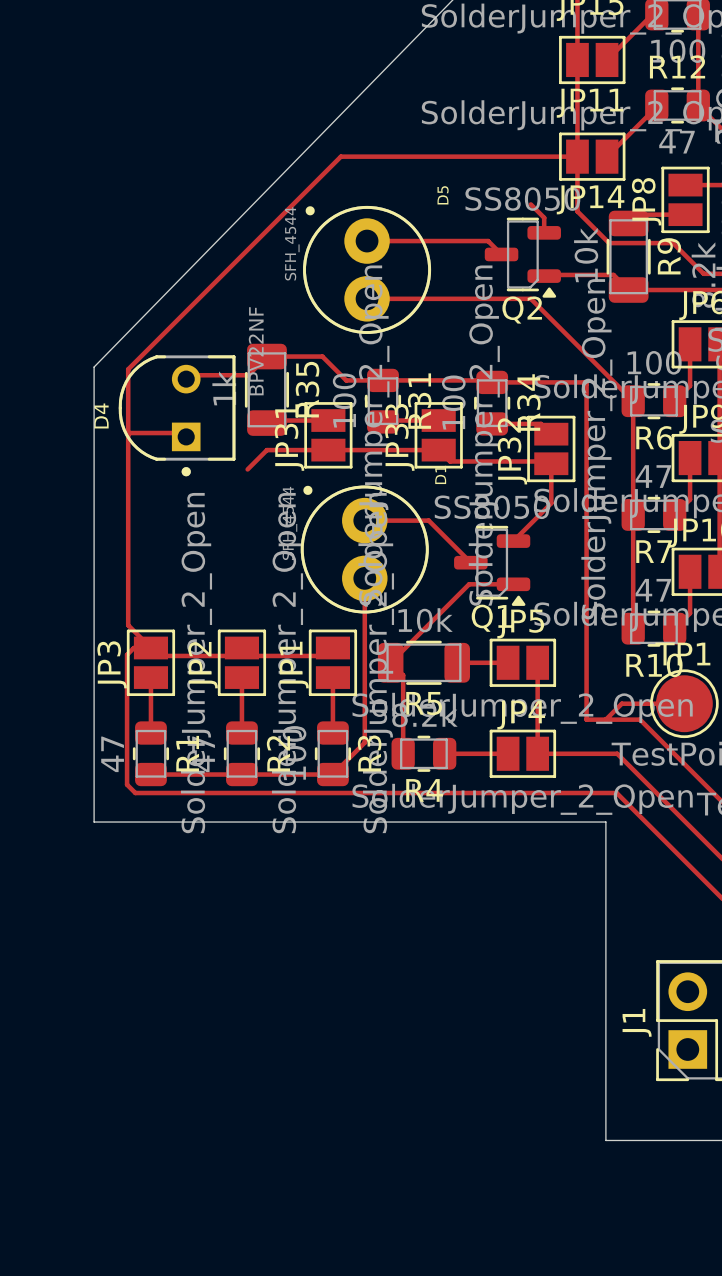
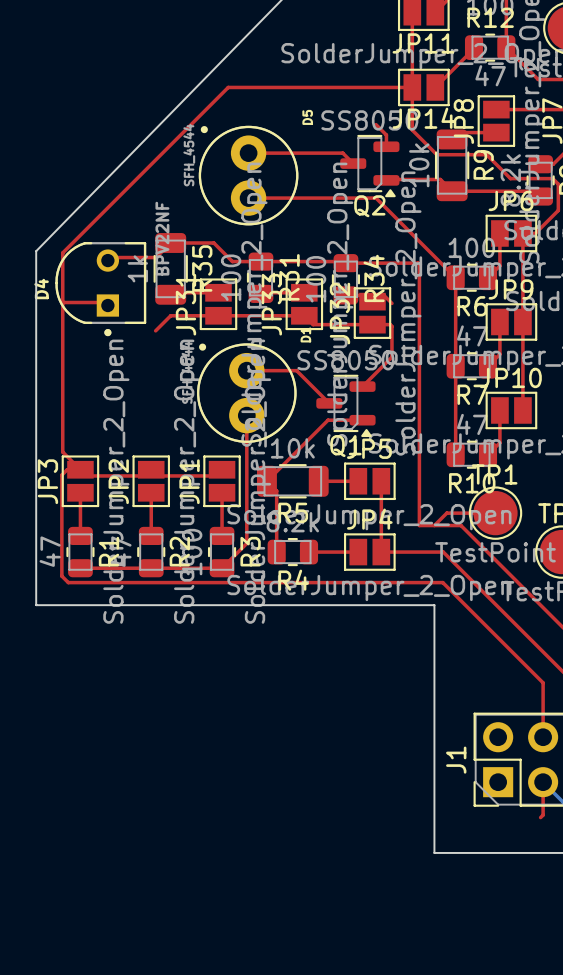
JP32 position: (551, 448) -> (372, 313)

